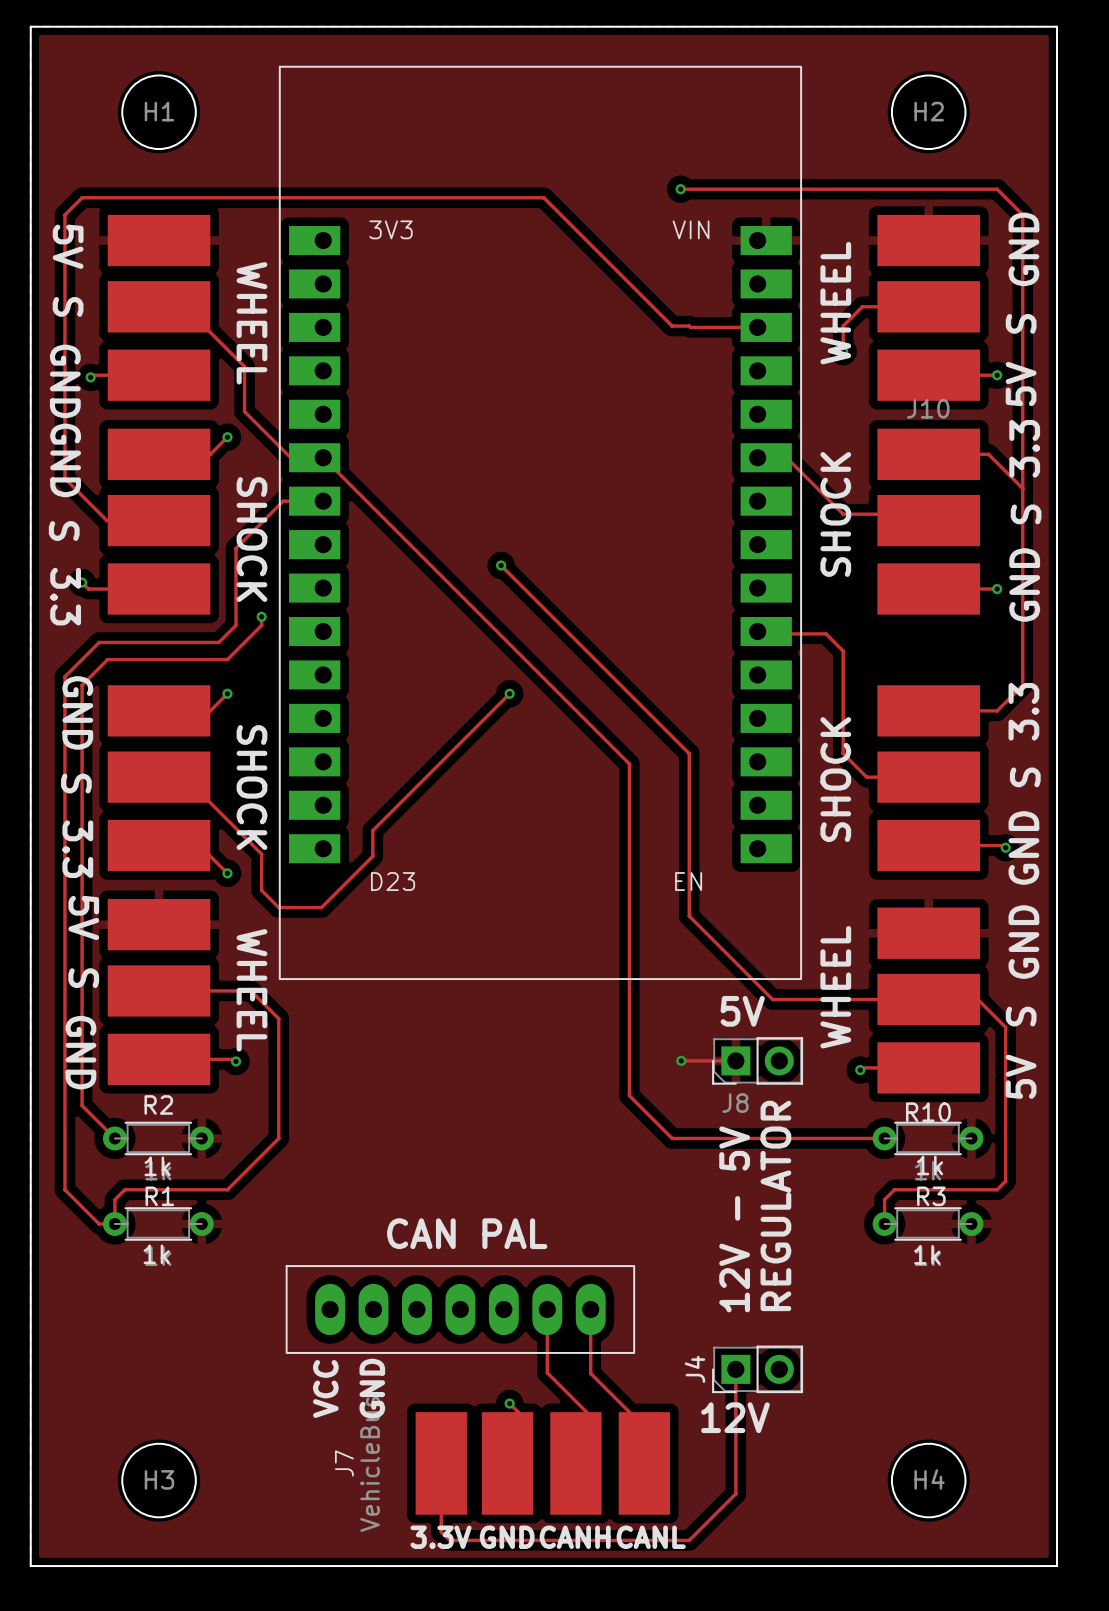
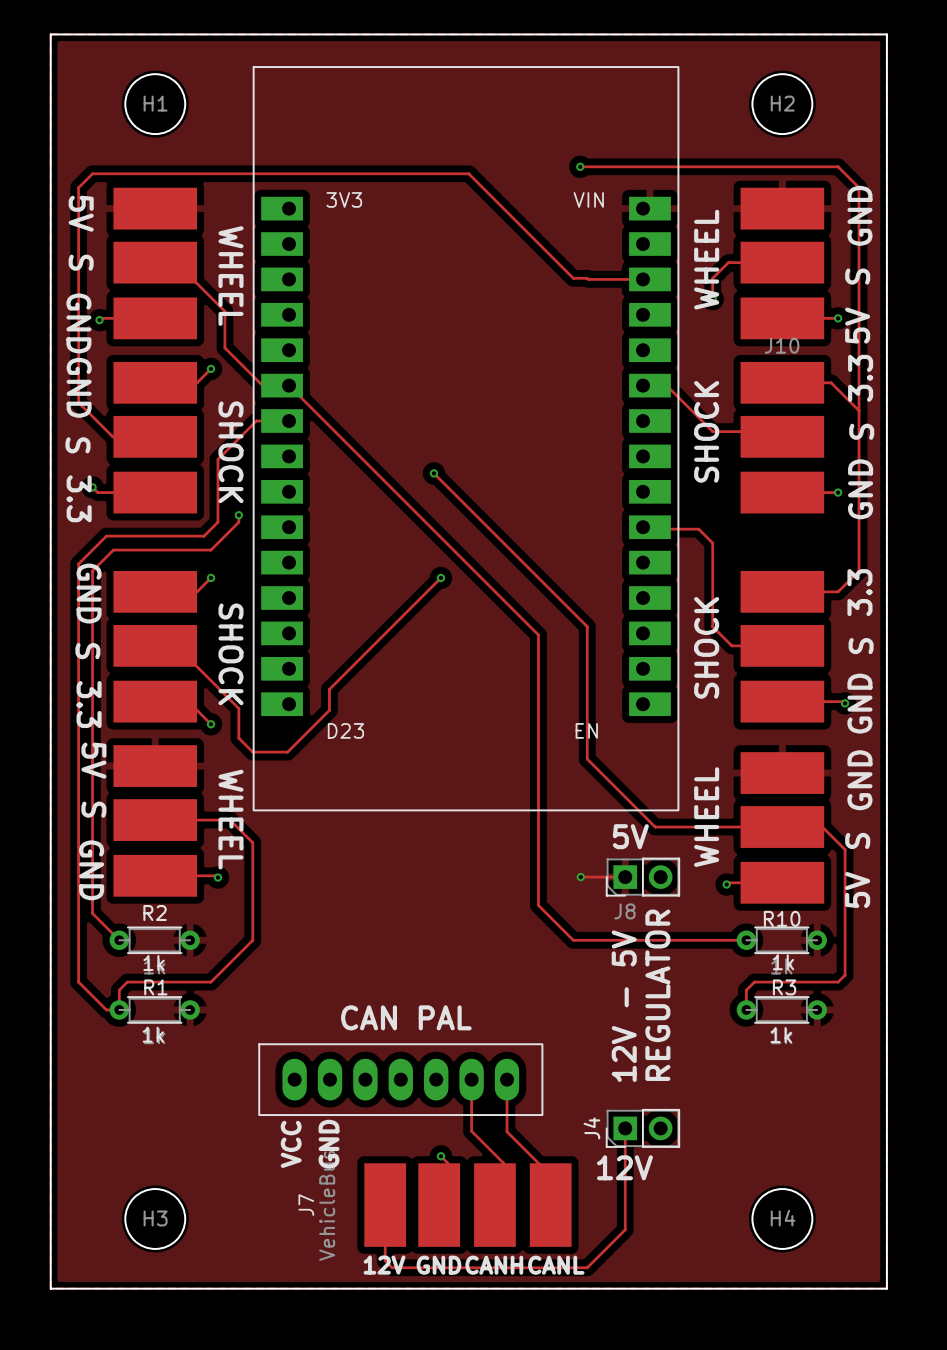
text: 3.3V (441, 1537) -> 12V (384, 1265)

